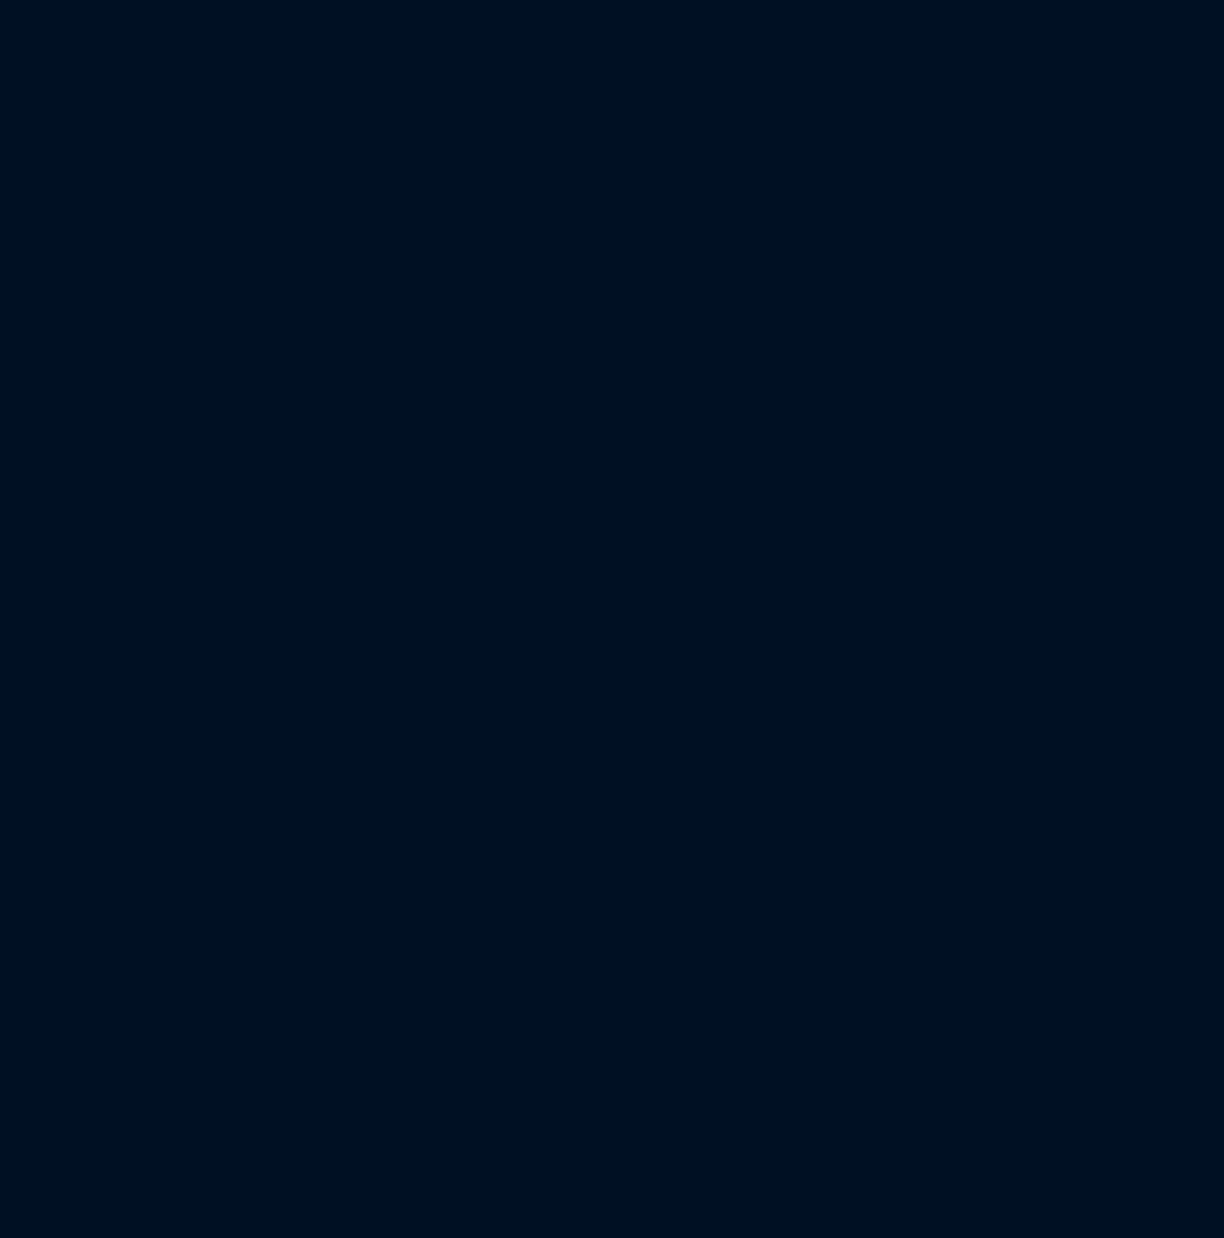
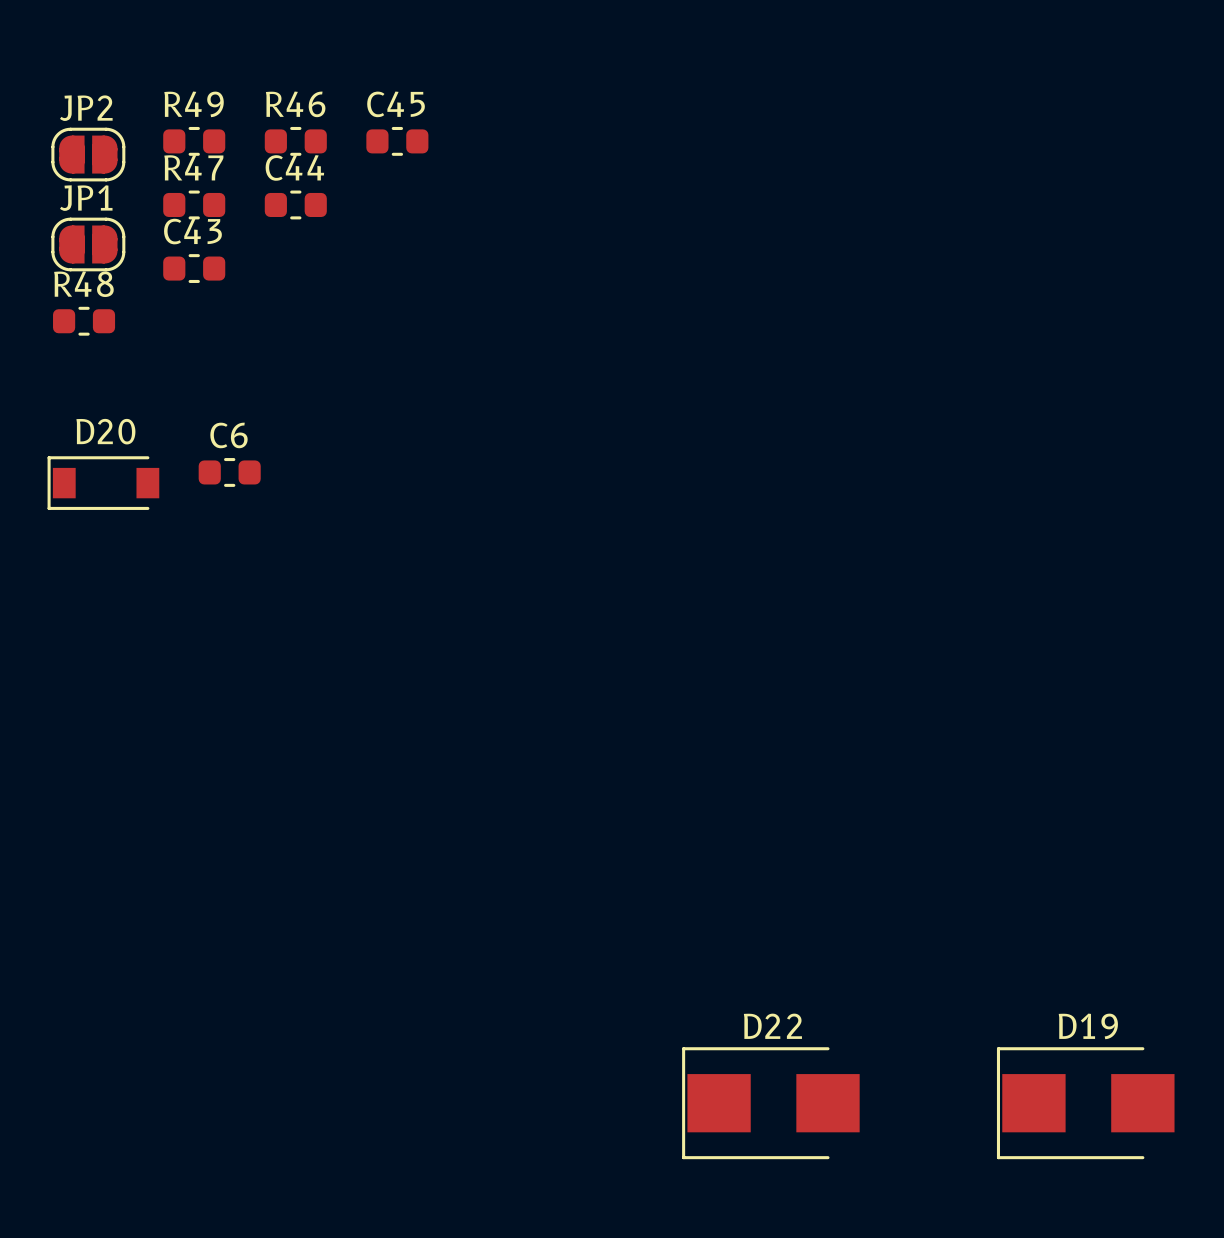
R49: none -> (194, 141)
R46: none -> (295, 141)
C45: none -> (397, 141)
JP2: none -> (88, 154)
R47: none -> (194, 204)
C44: none -> (295, 204)
JP1: none -> (88, 244)
C43: none -> (194, 268)
R48: none -> (84, 321)
C6: none -> (229, 472)
D20: none -> (103, 483)
D22: none -> (770, 1103)
D19: none -> (1085, 1103)

